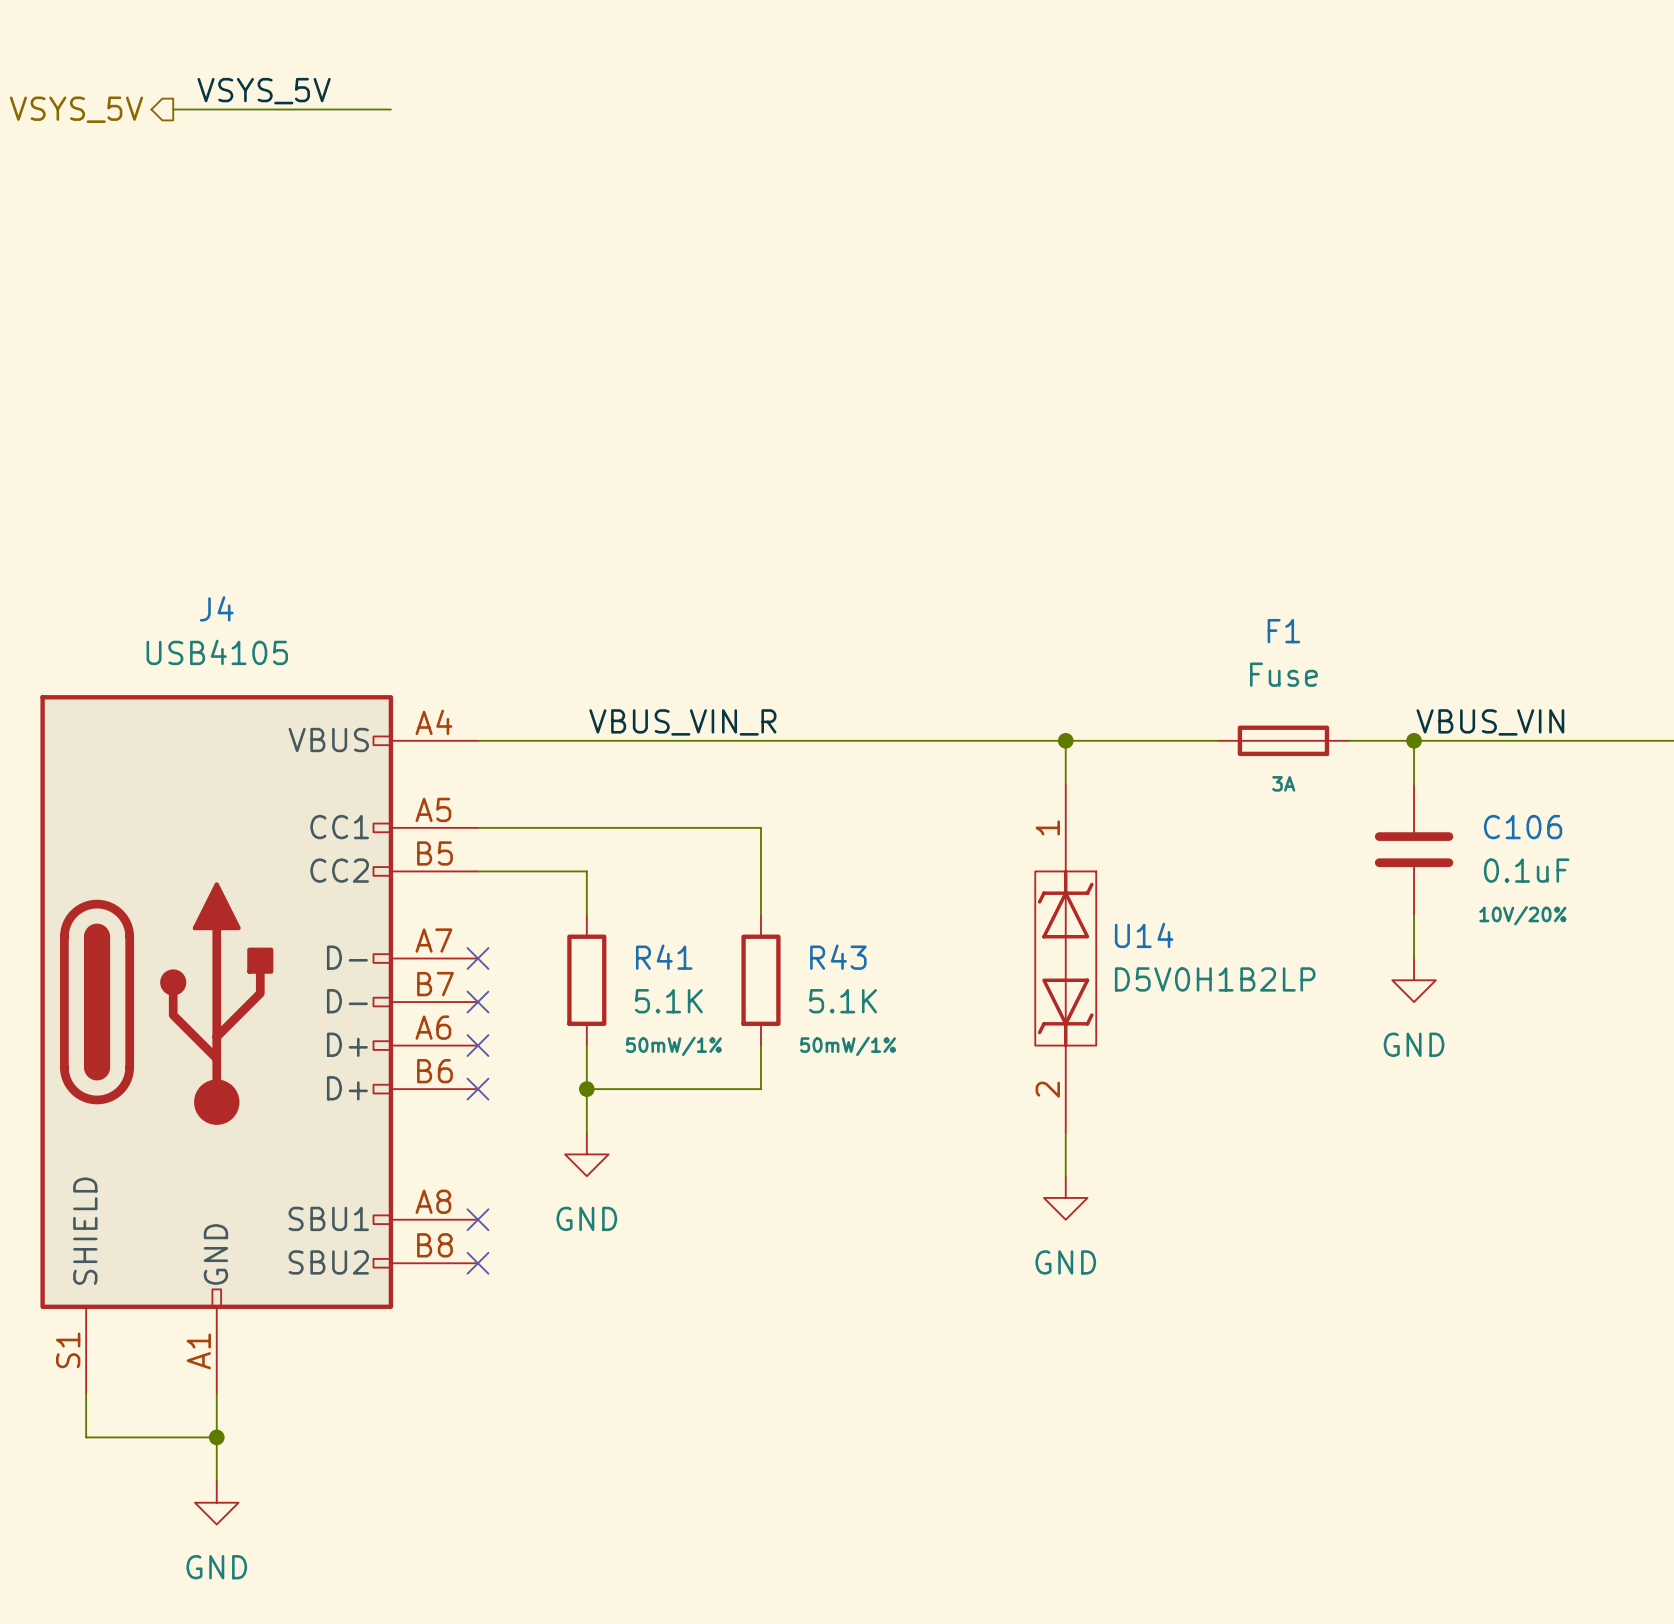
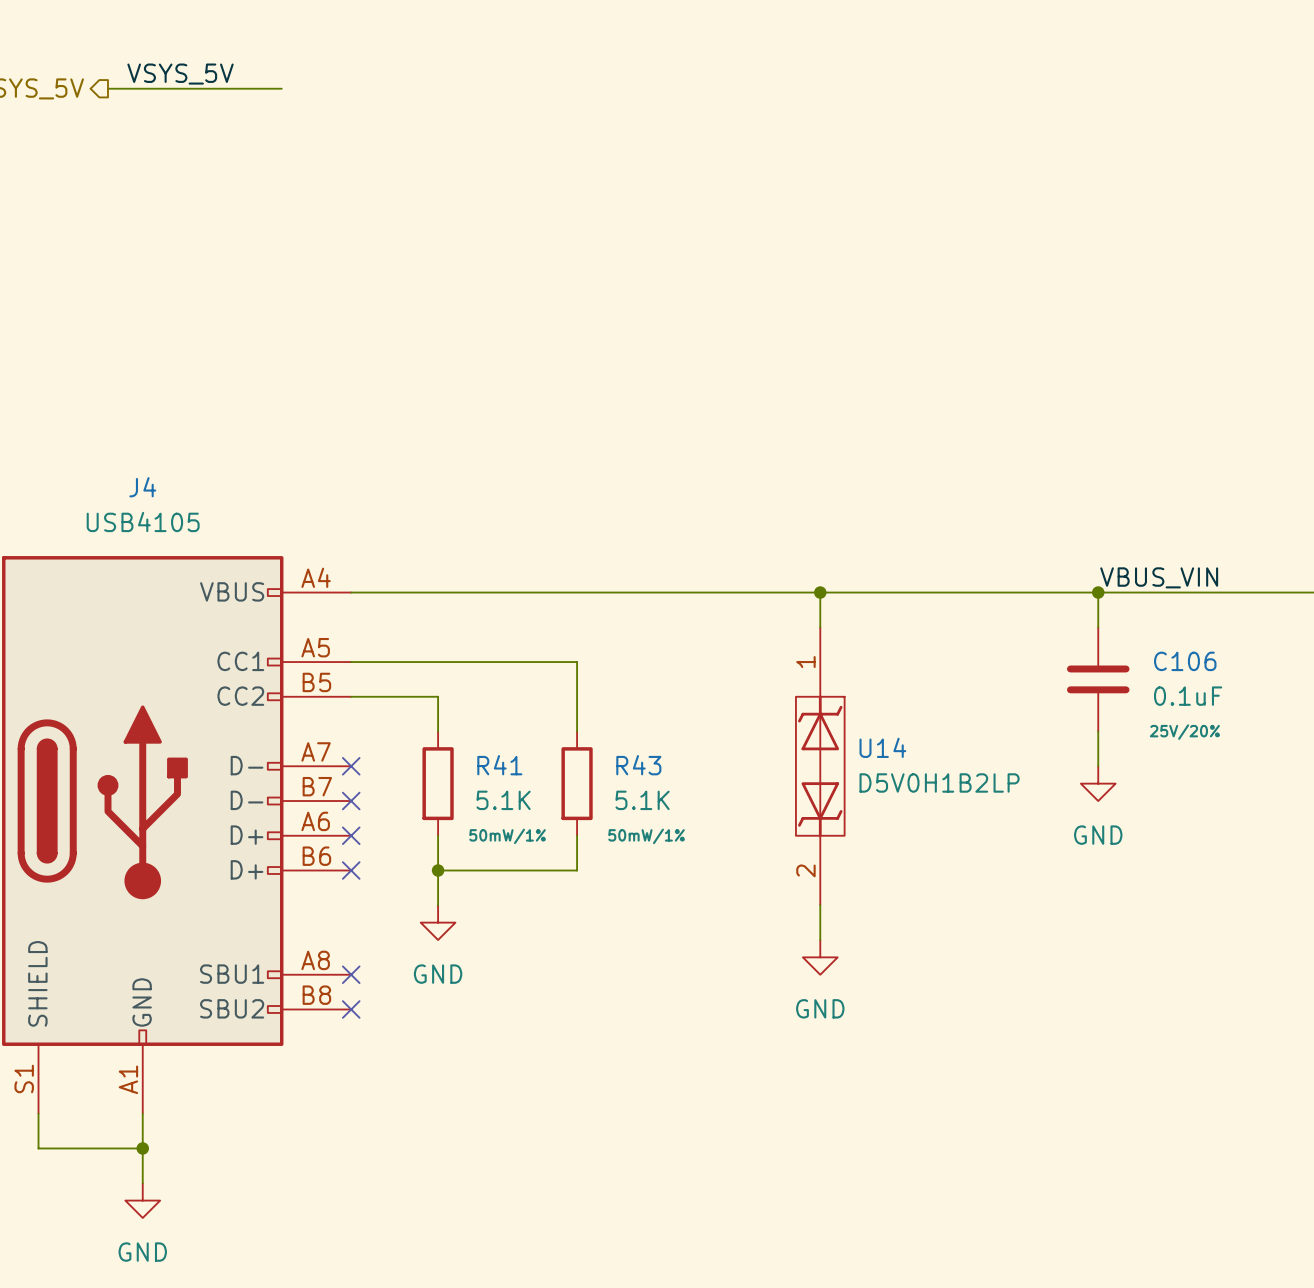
label: VBUS_VIN_R (682, 722) -> none
F1: Fuse (1283, 740) -> none
C106 text: 10V/20% (1522, 915) -> 25V/20% (1184, 732)

